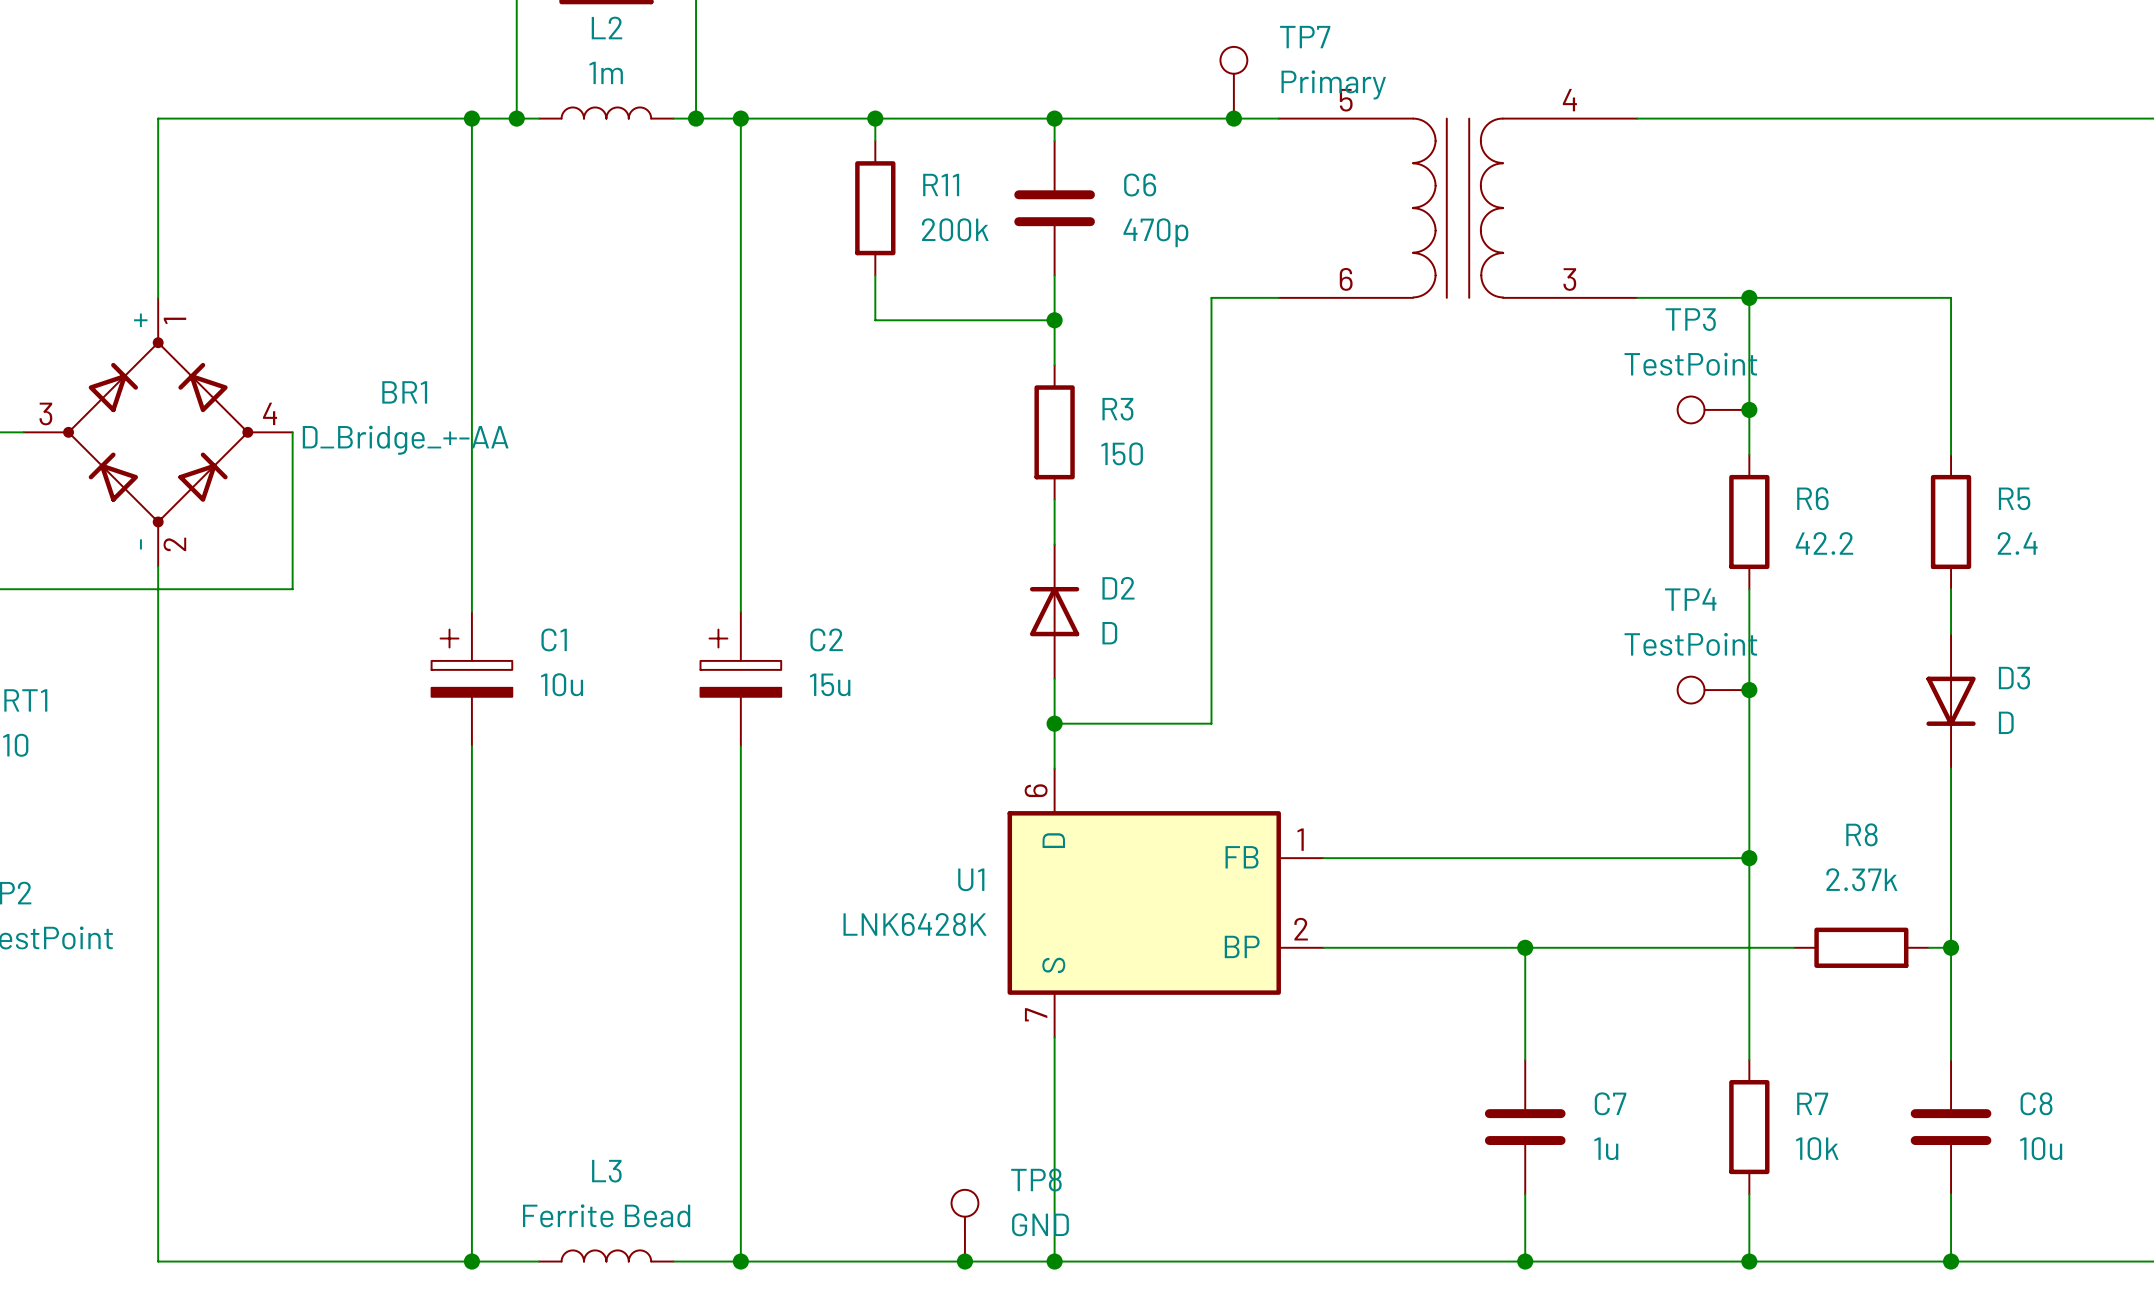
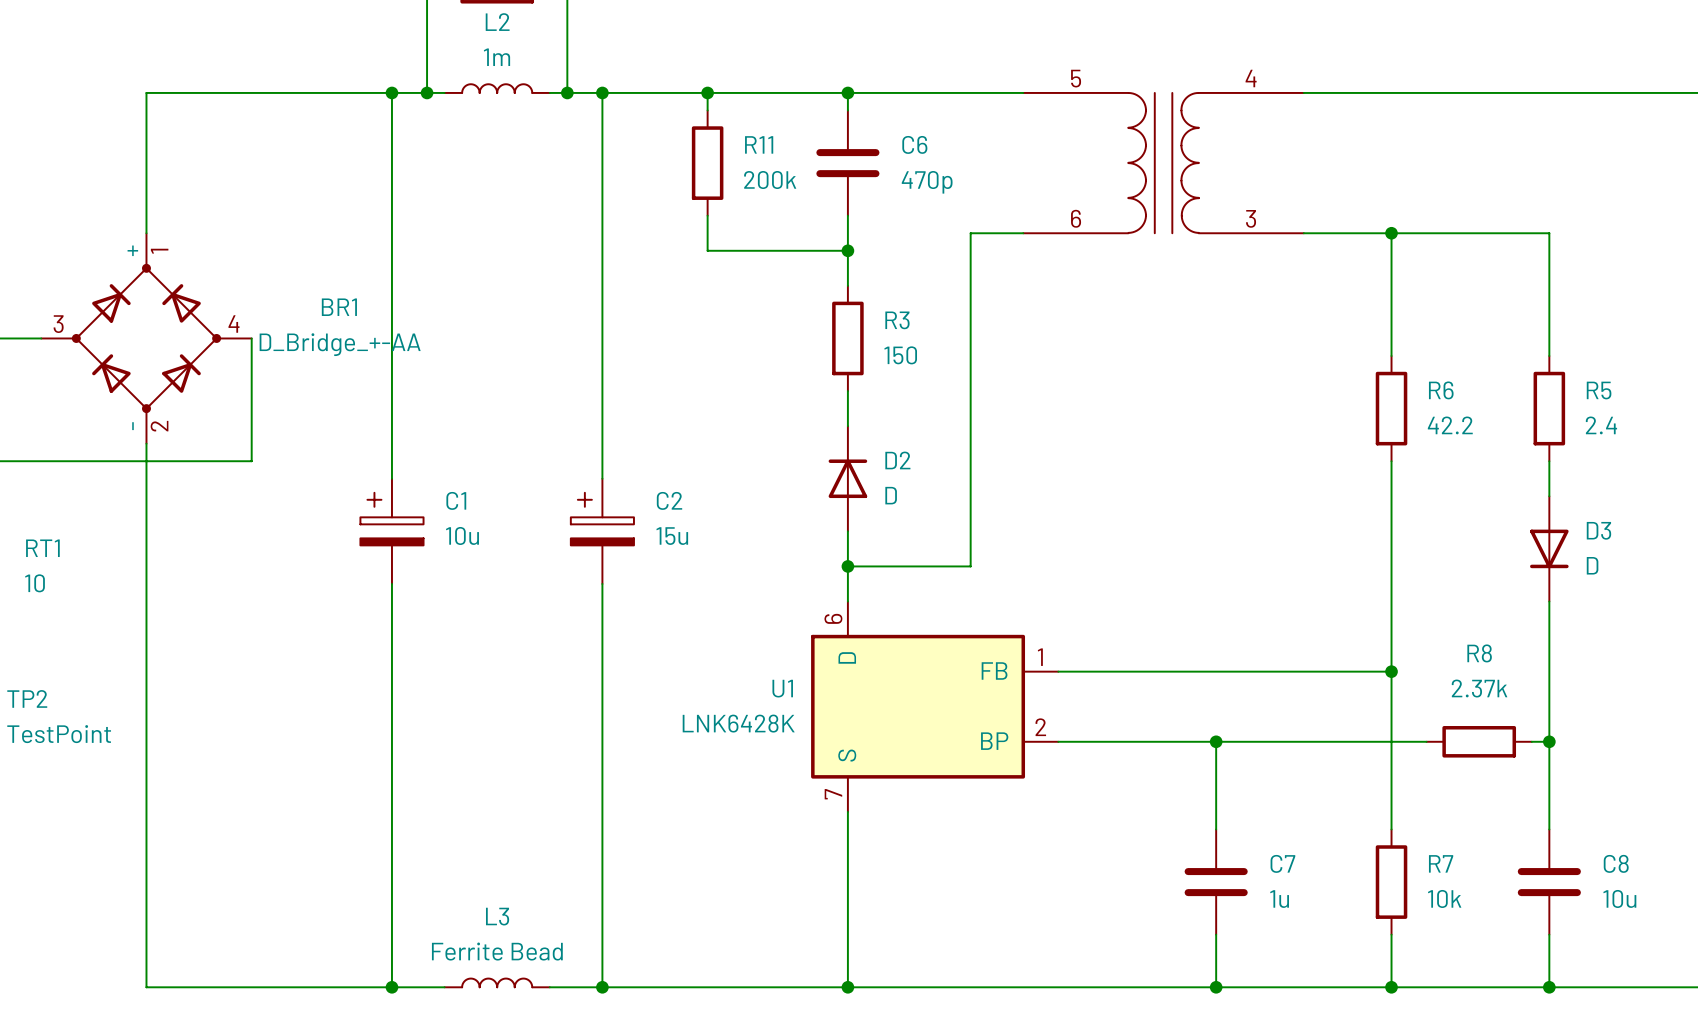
TP7: Primary (1233, 82) -> none
junction: (1233, 118) -> none
TP3: TestPoint (1713, 409) -> none
junction: (1749, 409) -> none
TP4: TestPoint (1713, 690) -> none
junction: (1749, 690) -> none
TP8: GND (964, 1225) -> none
junction: (964, 1261) -> none

